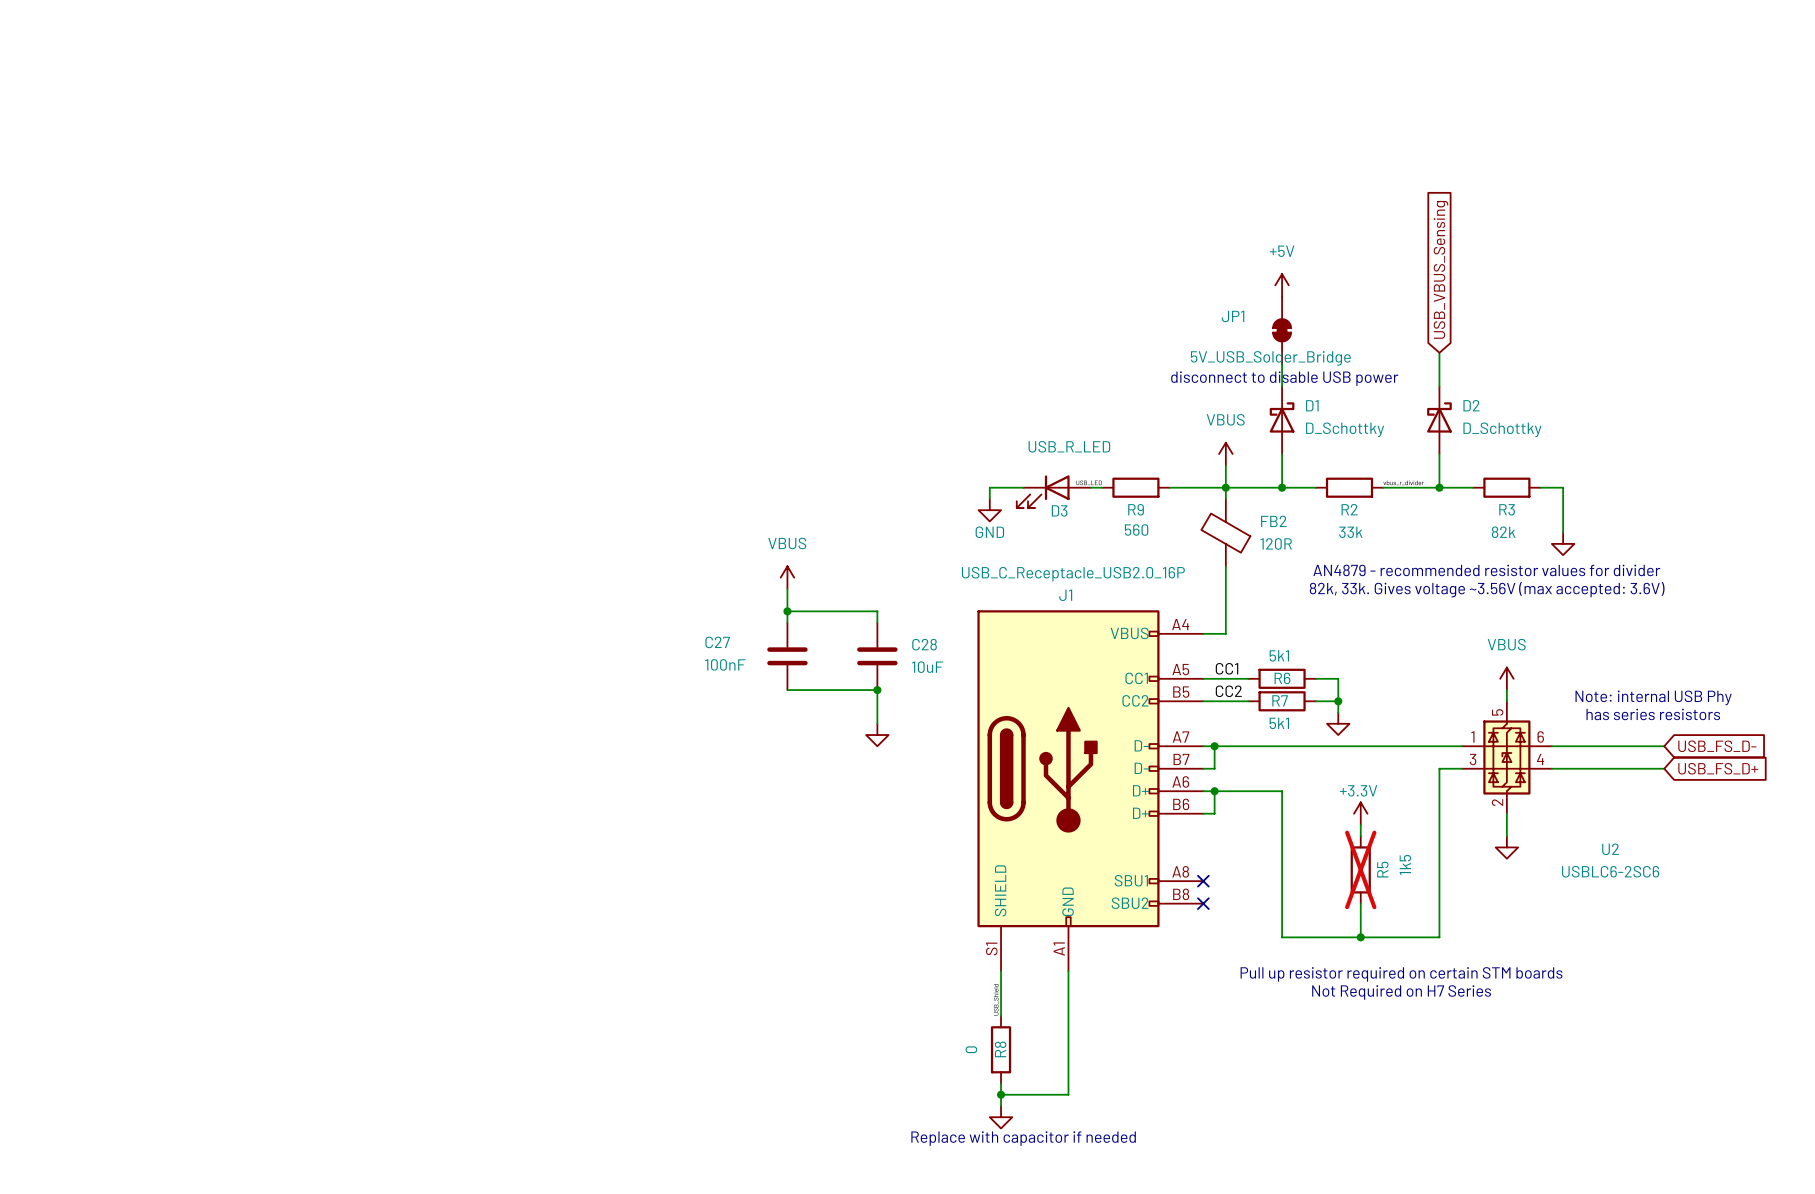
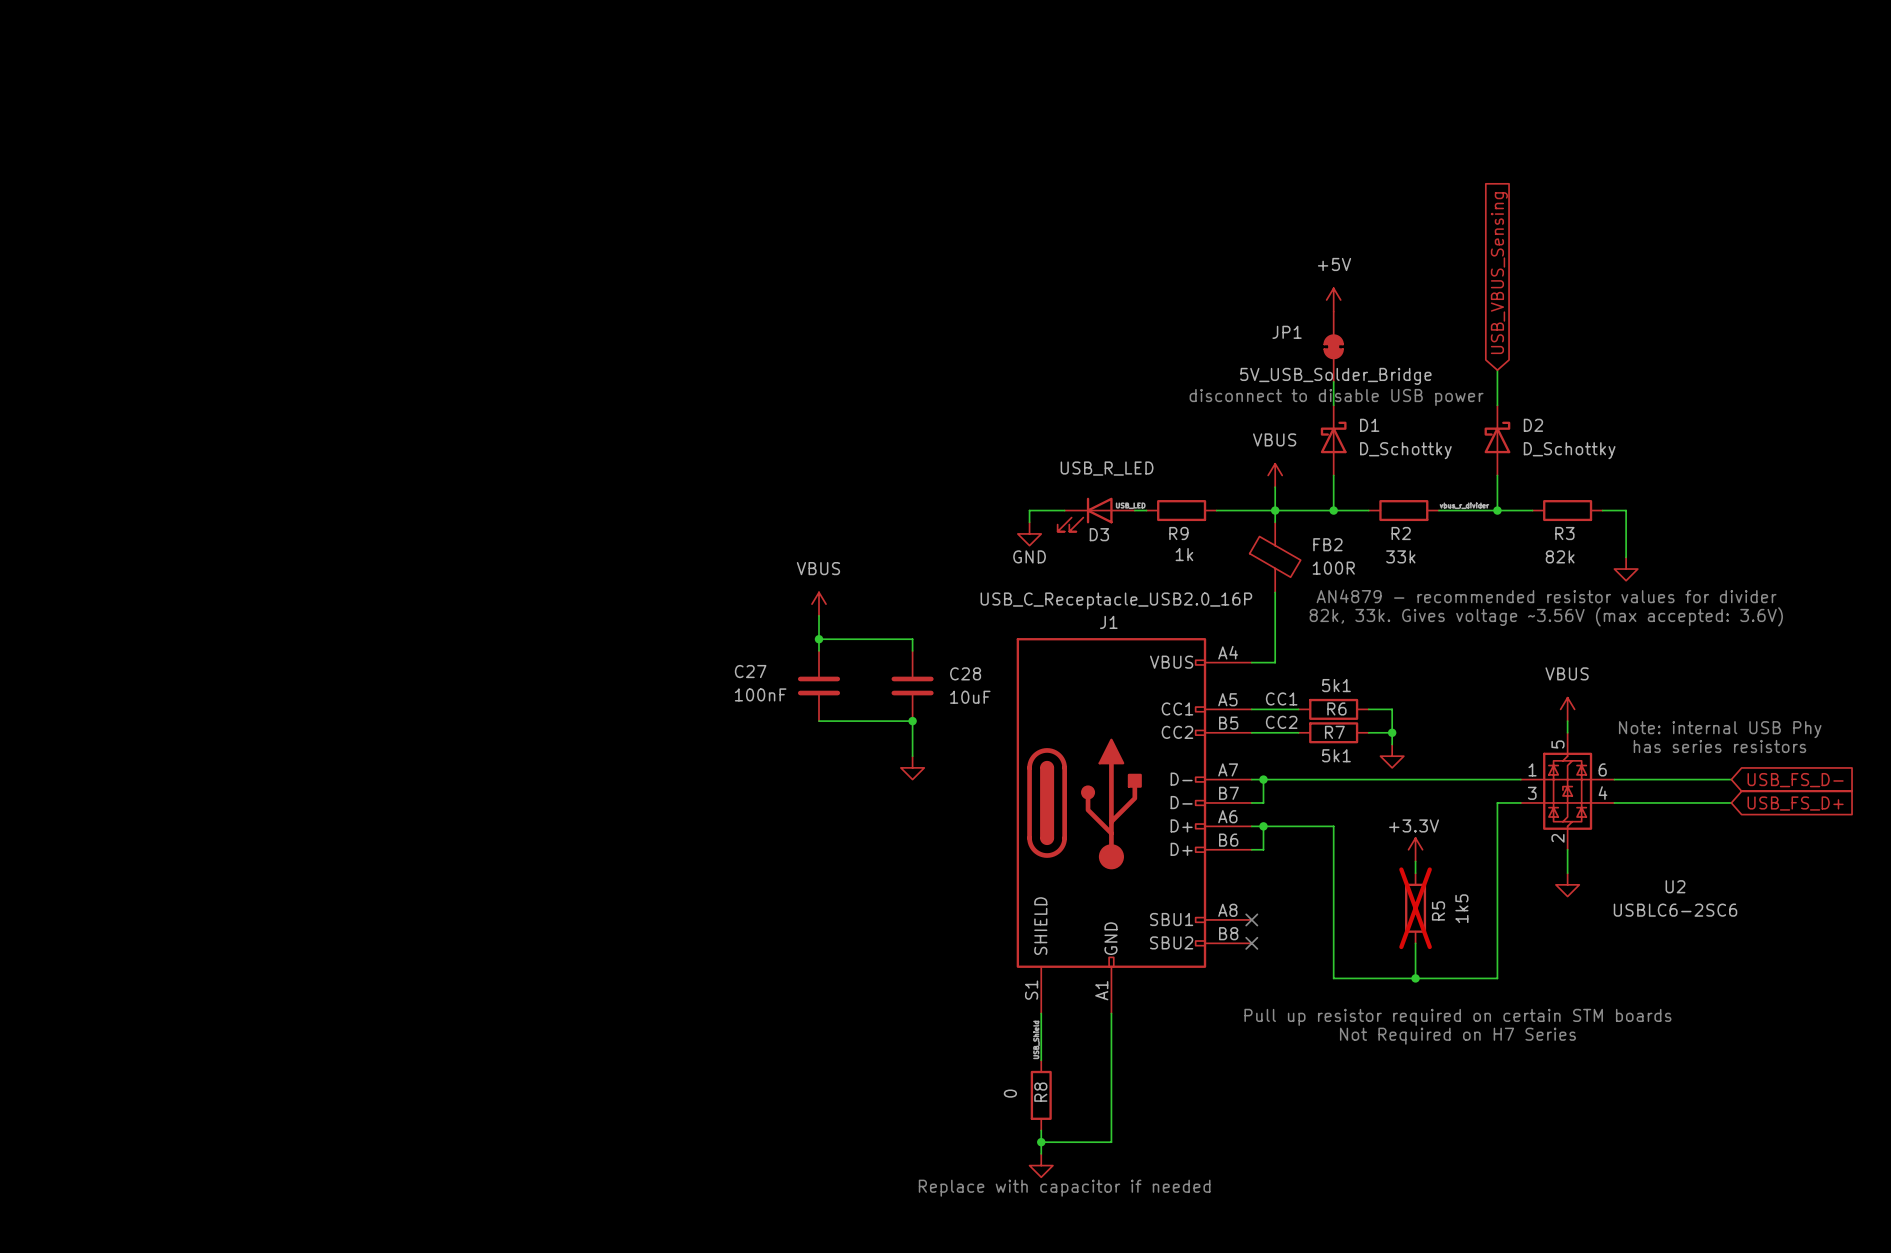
R9 value: 560 (1136, 530) -> 1k (1184, 554)
FB2 rotation: 0° (1225, 533) -> 180° (1275, 556)
FB2 value: 120R (1276, 543) -> 100R (1333, 568)

